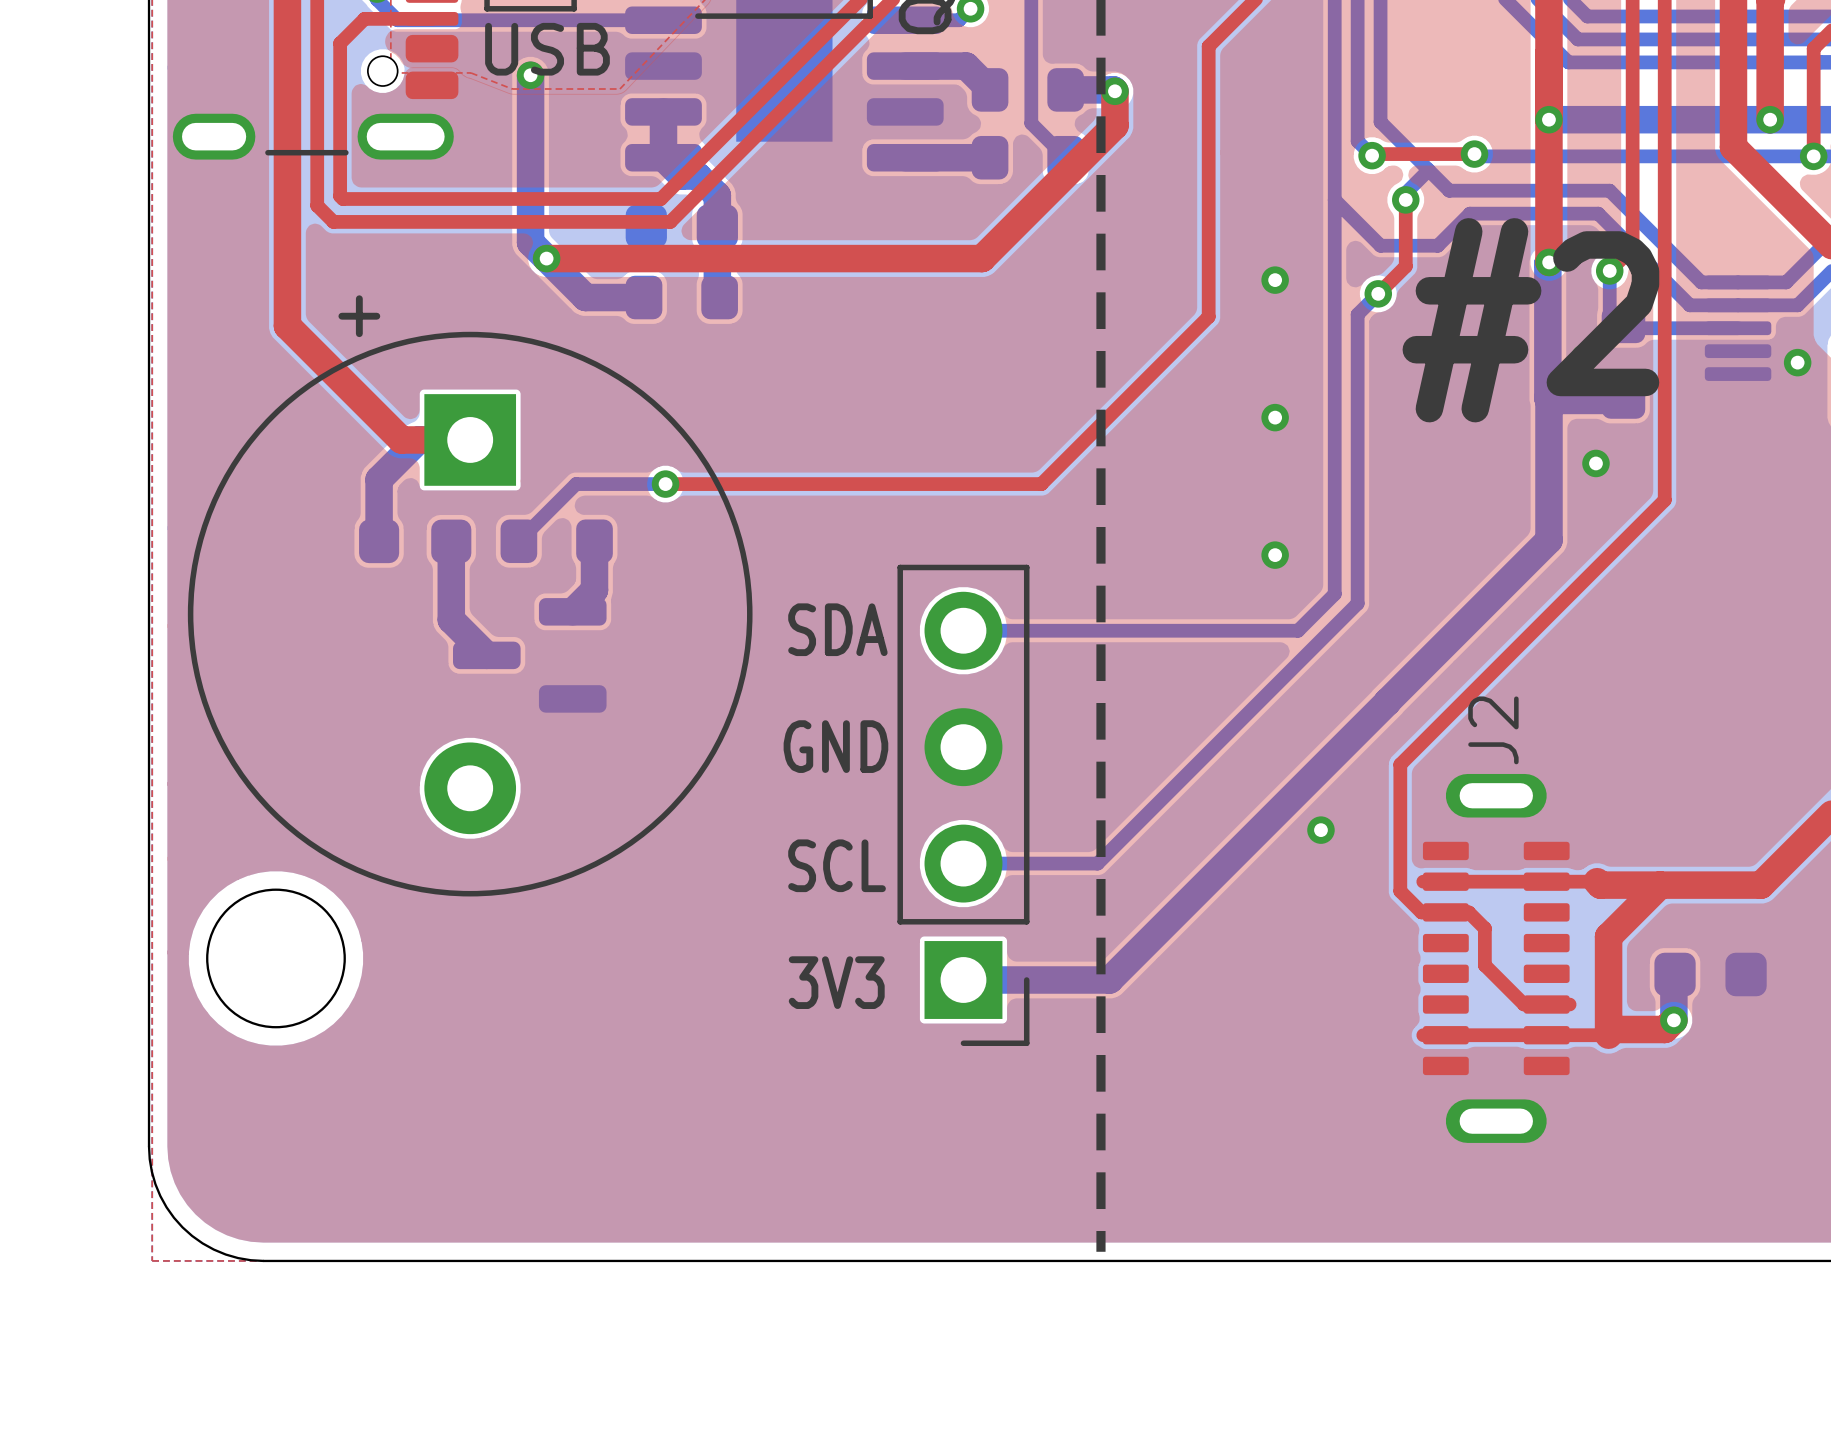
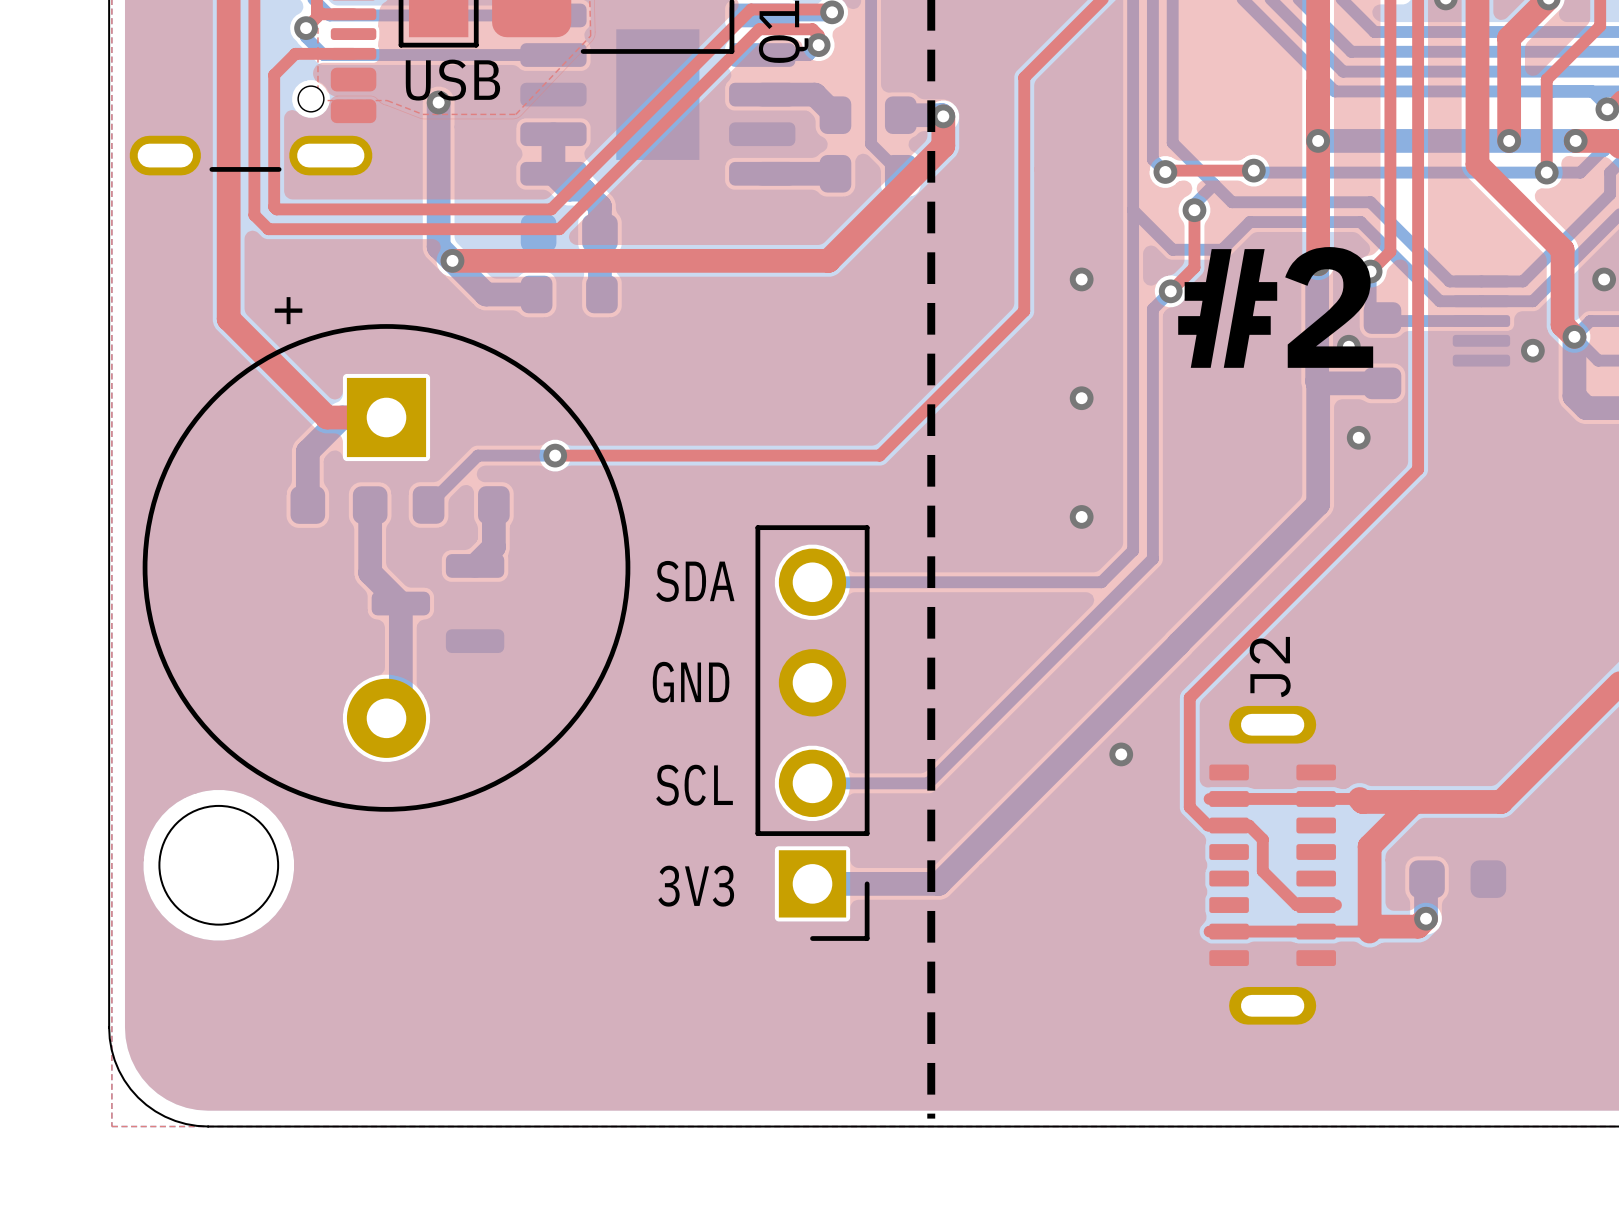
bottom track: none -> (400, 603) (400, 703) (386, 718)

